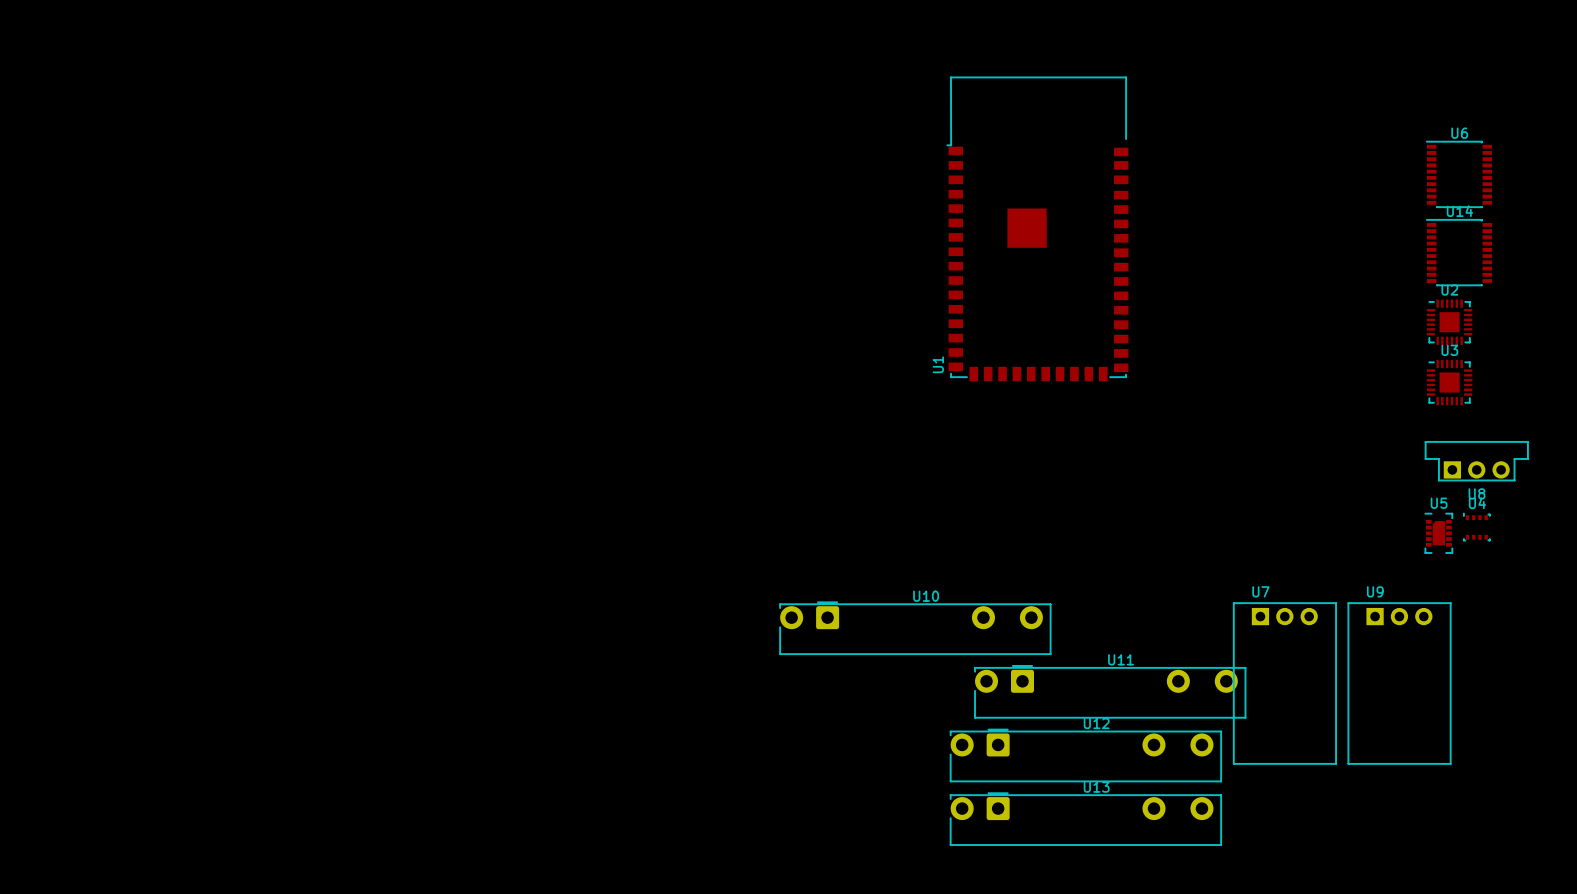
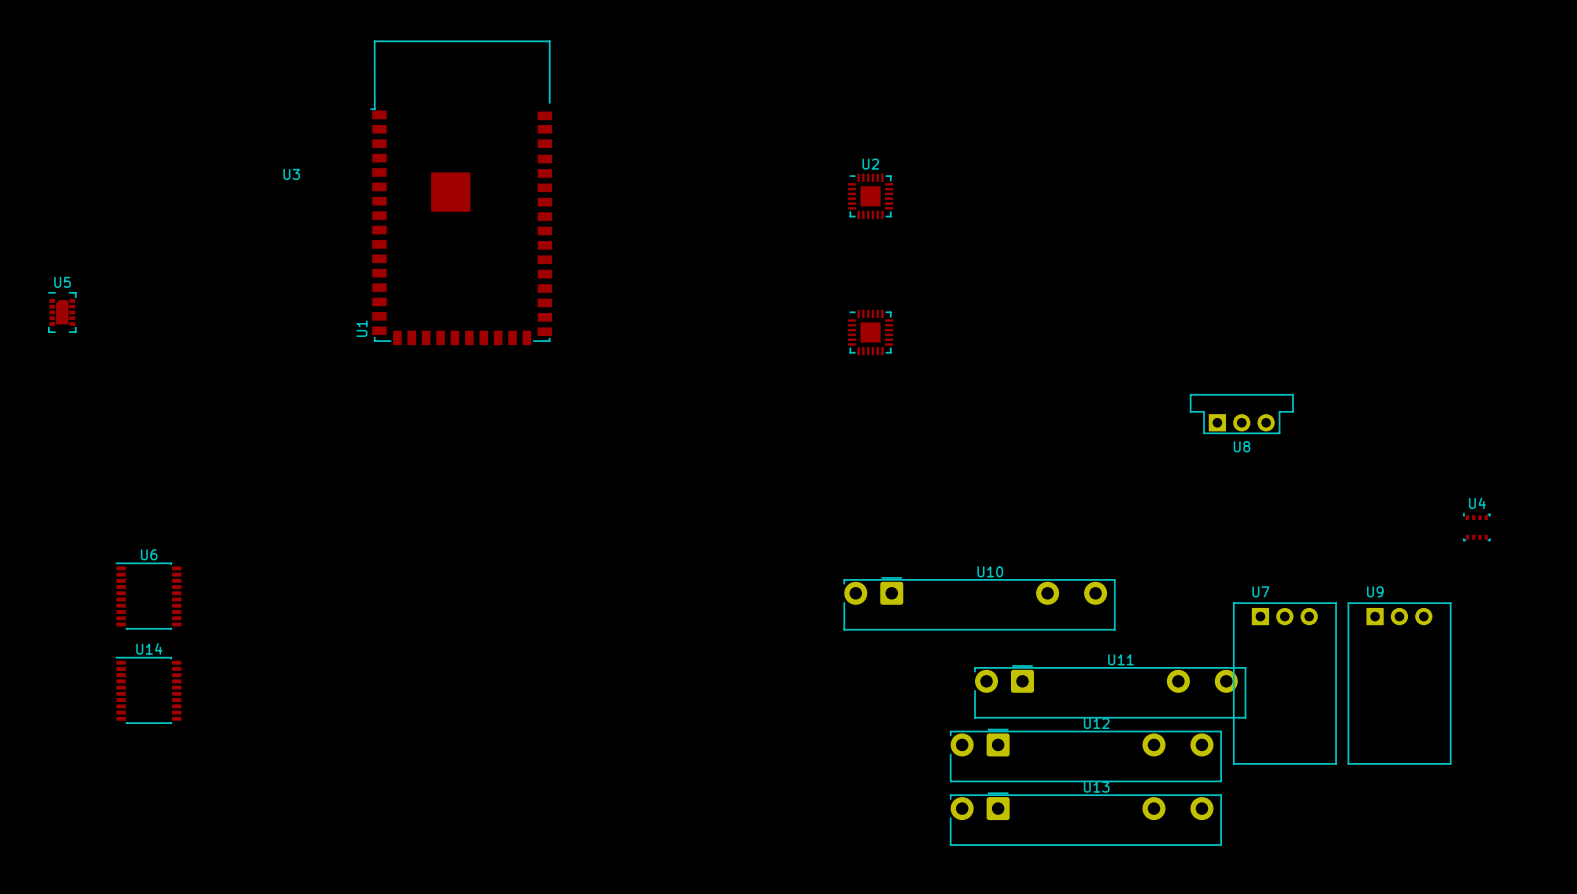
U6 position: (1459, 174) -> (148, 596)
U1 position: (1037, 229) -> (461, 192)
U14 position: (1459, 252) -> (148, 690)
U2 position: (1449, 322) -> (870, 196)
U3 name position: U3 (1449, 350) -> U3 (291, 174)
U3 position: (1449, 382) -> (870, 332)
U8 position: (1476, 461) -> (1241, 414)
U5 position: (1438, 533) -> (62, 312)
U10 position: (915, 628) -> (979, 603)

